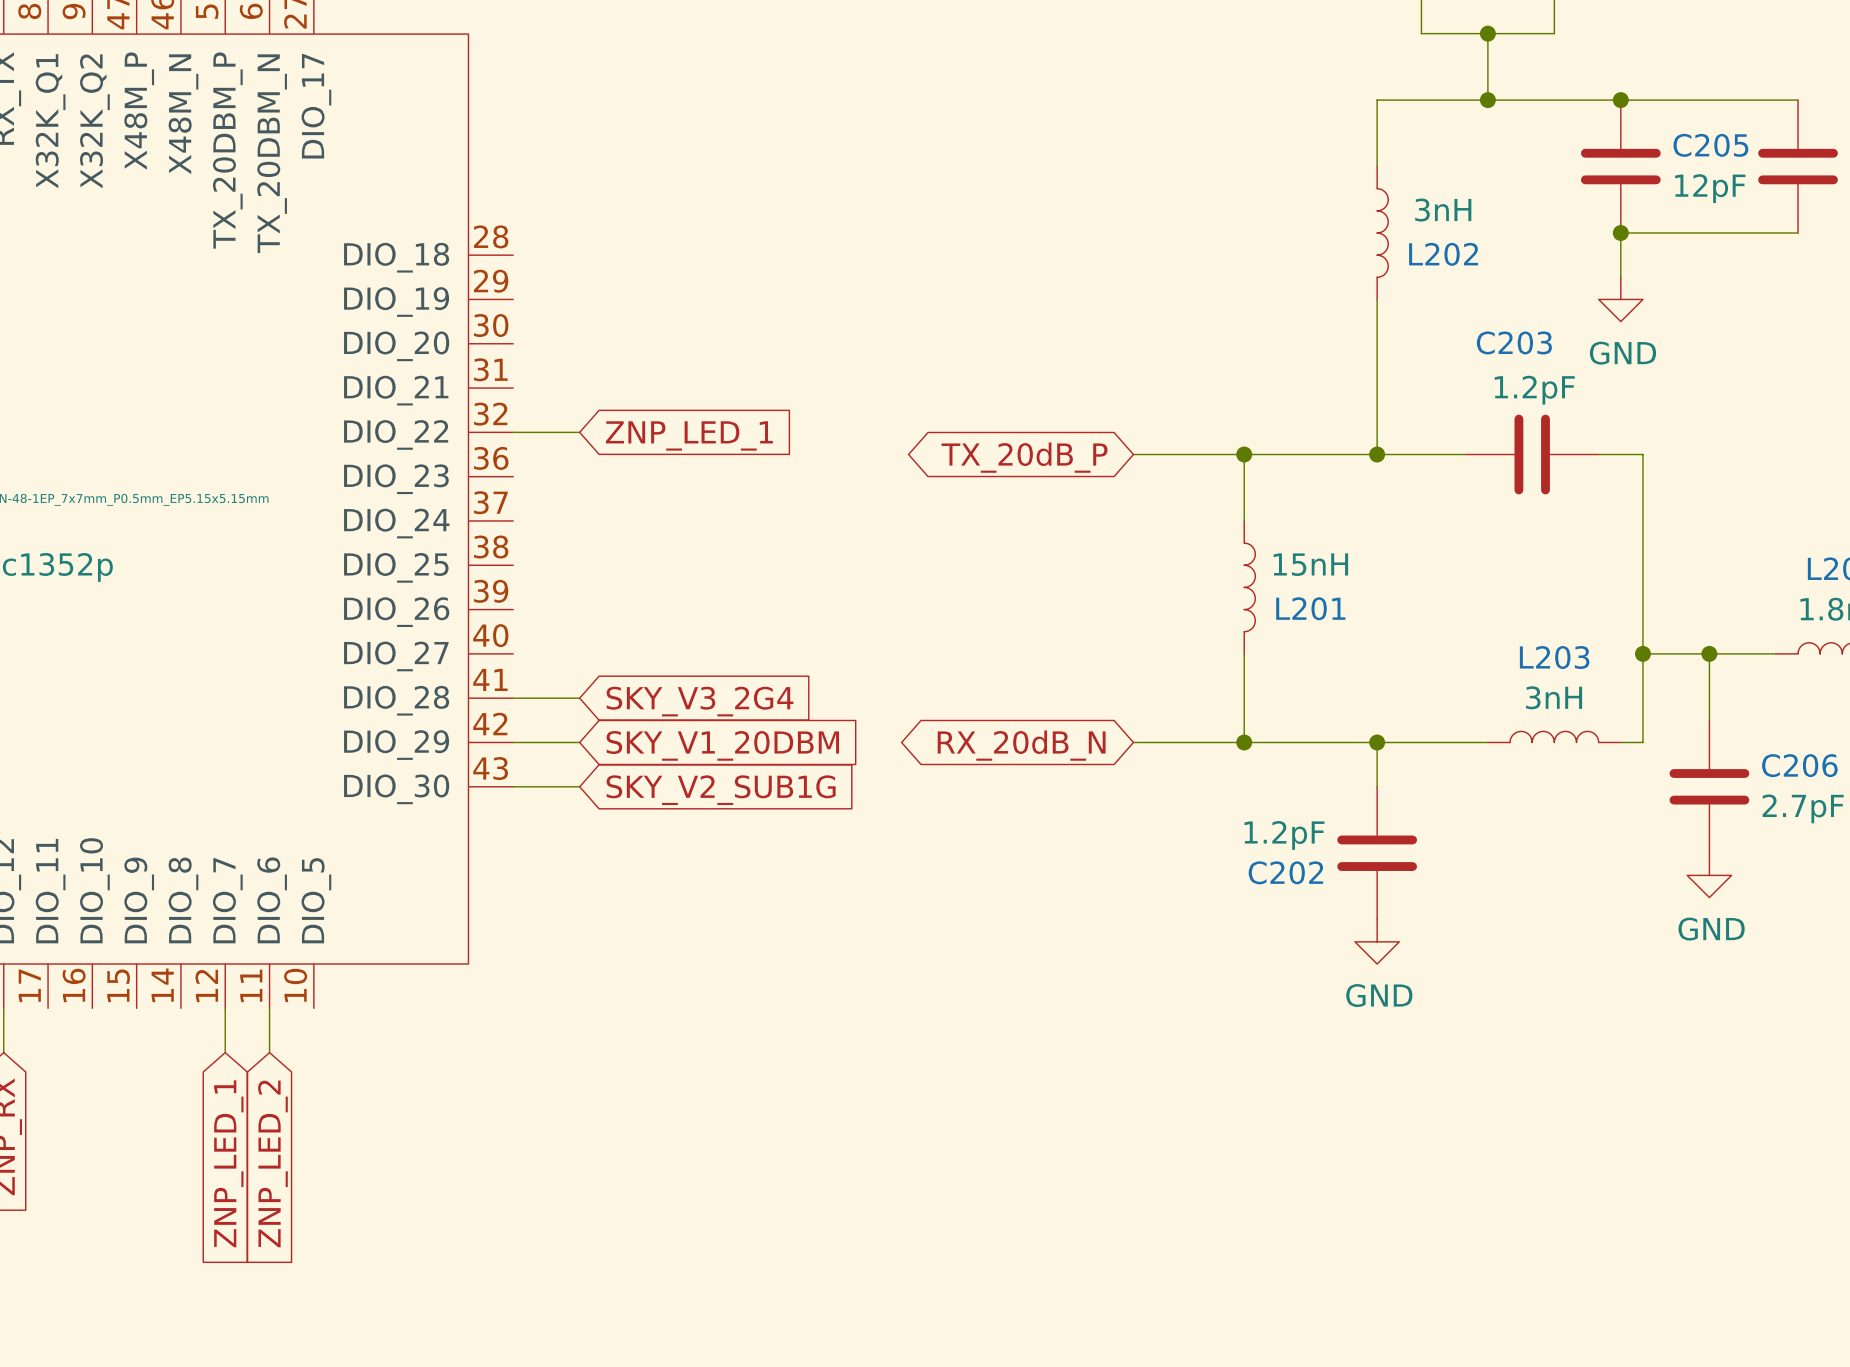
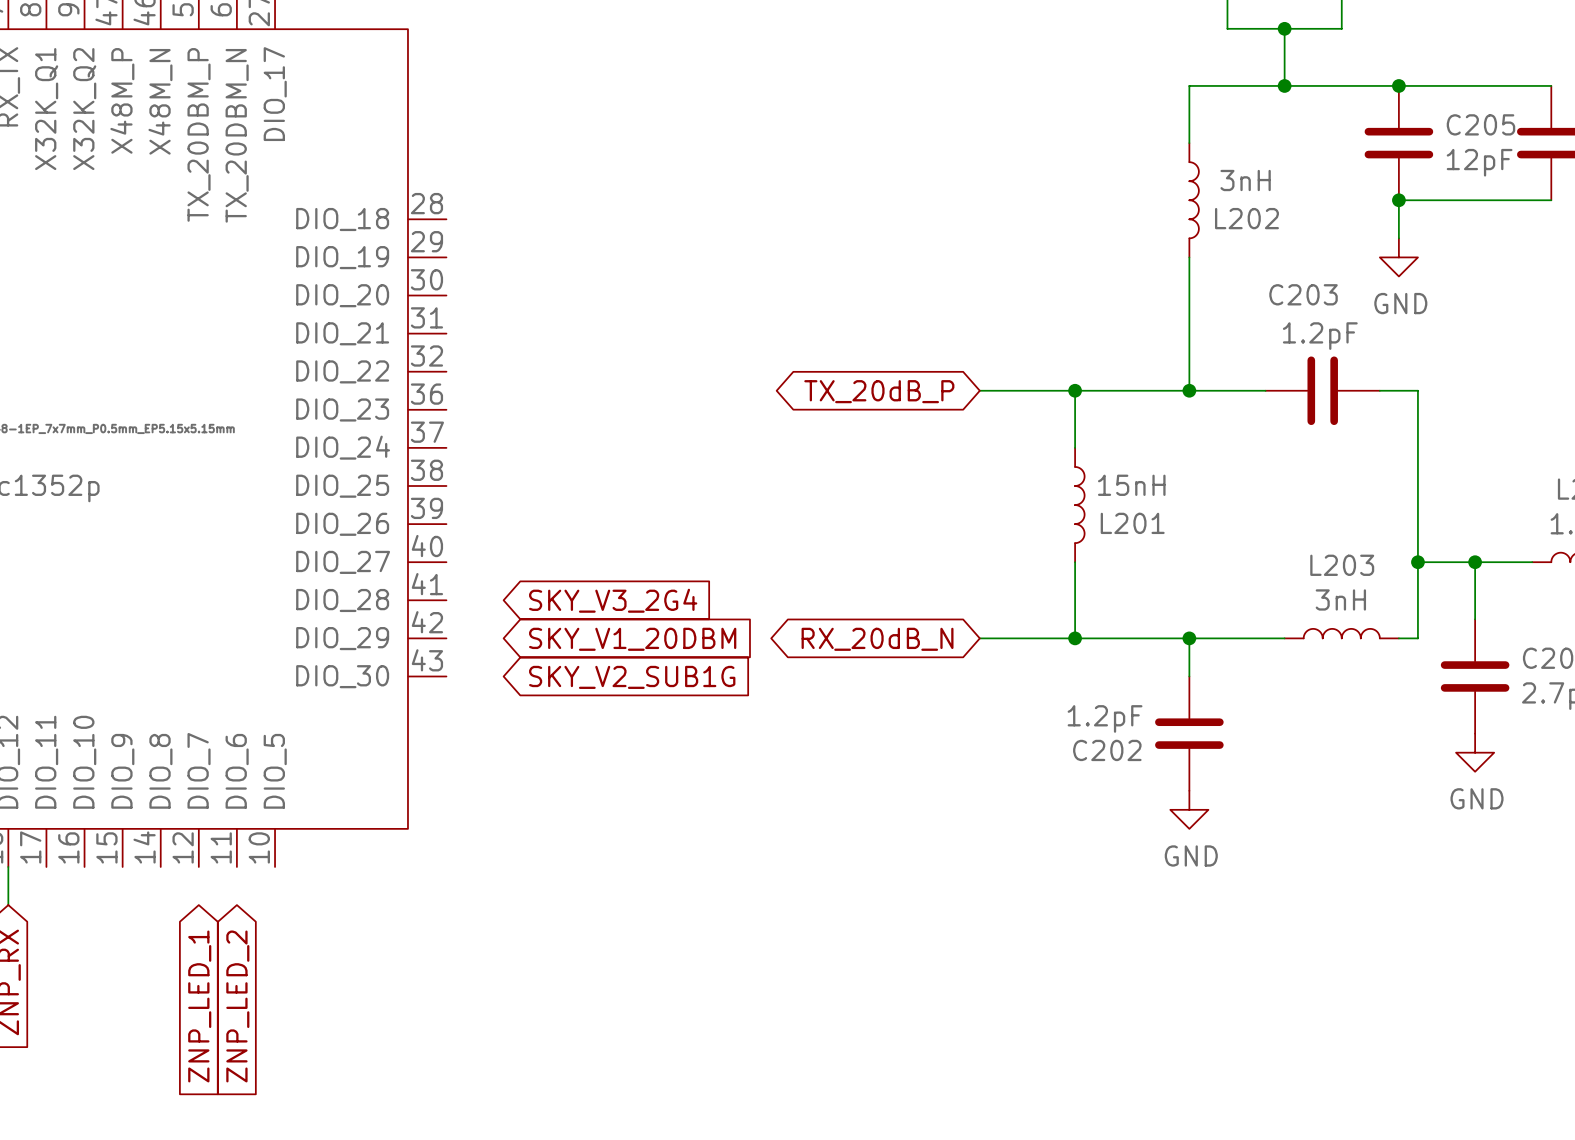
wire: (513, 432) (579, 432) -> none
global label: ZNP_LED_1 (689, 435) -> none
wire: (513, 698) (579, 698) -> none
wire: (513, 742) (579, 742) -> none
wire: (513, 786) (579, 786) -> none
wire: (225, 1008) (225, 1052) -> none
wire: (269, 1008) (269, 1052) -> none

